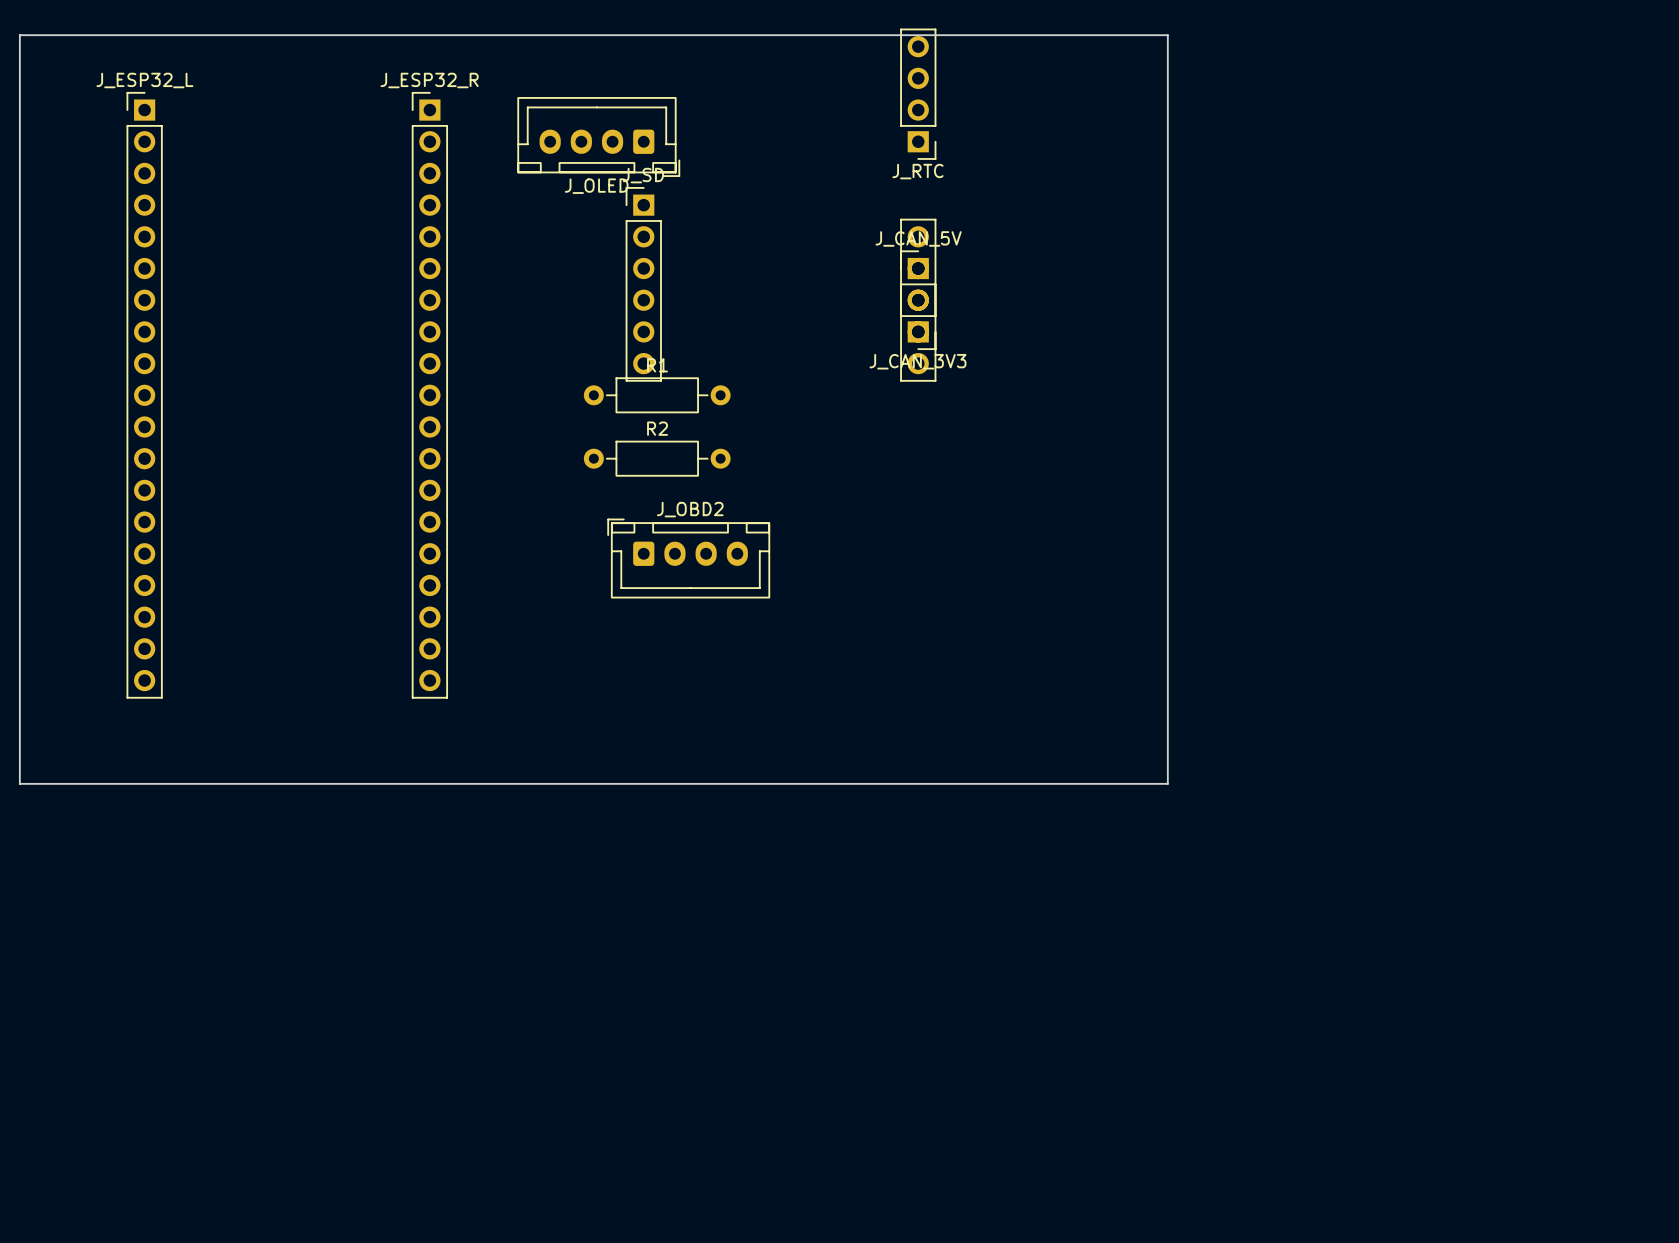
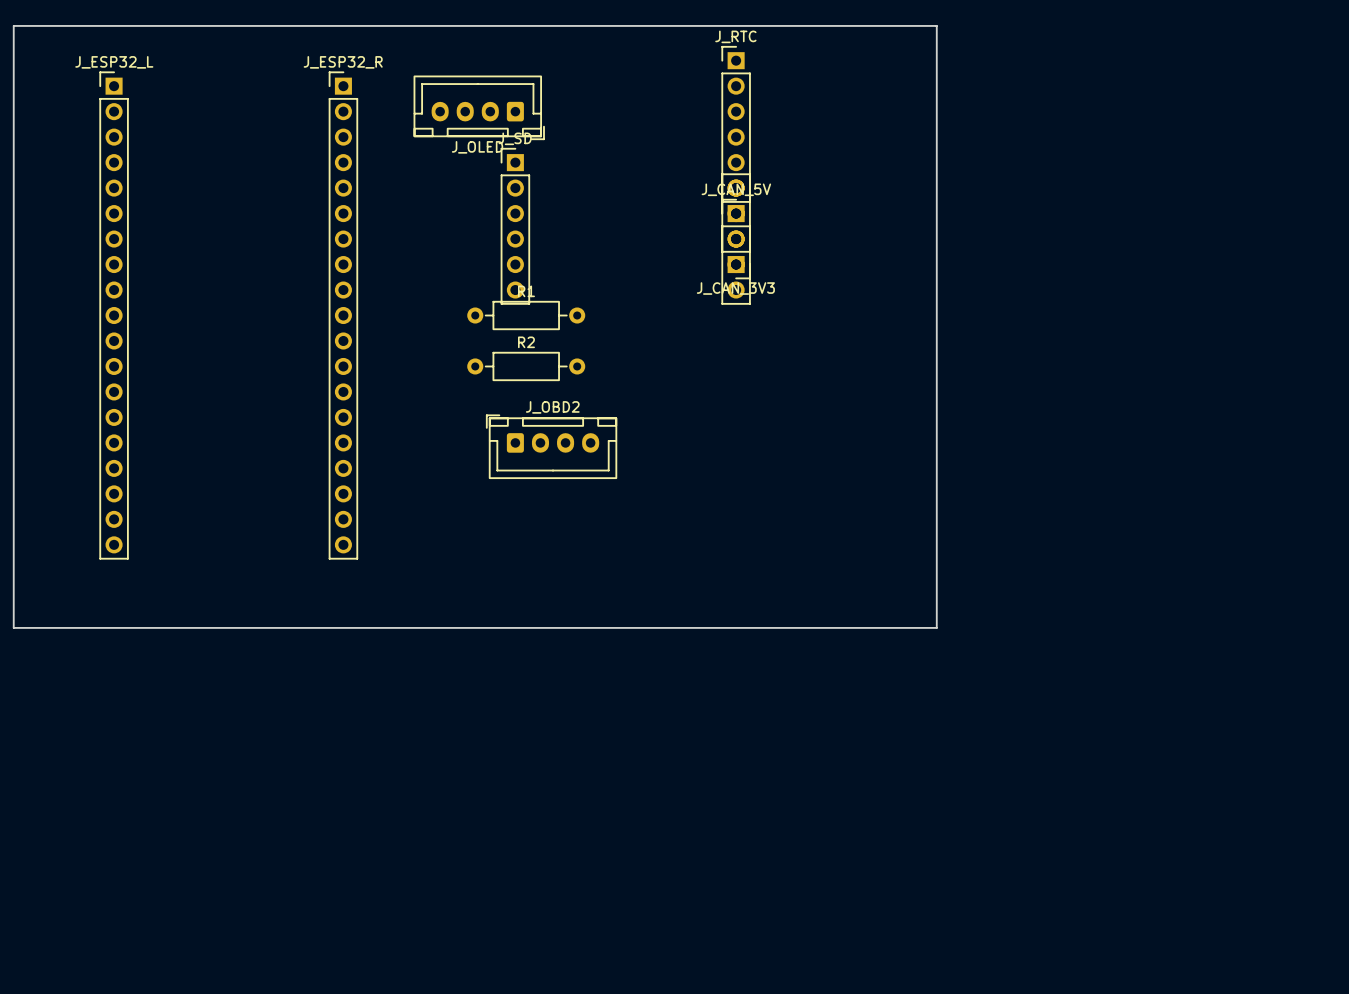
J_RTC: (918, 94) -> none
J_RTC: none -> (736, 124)

